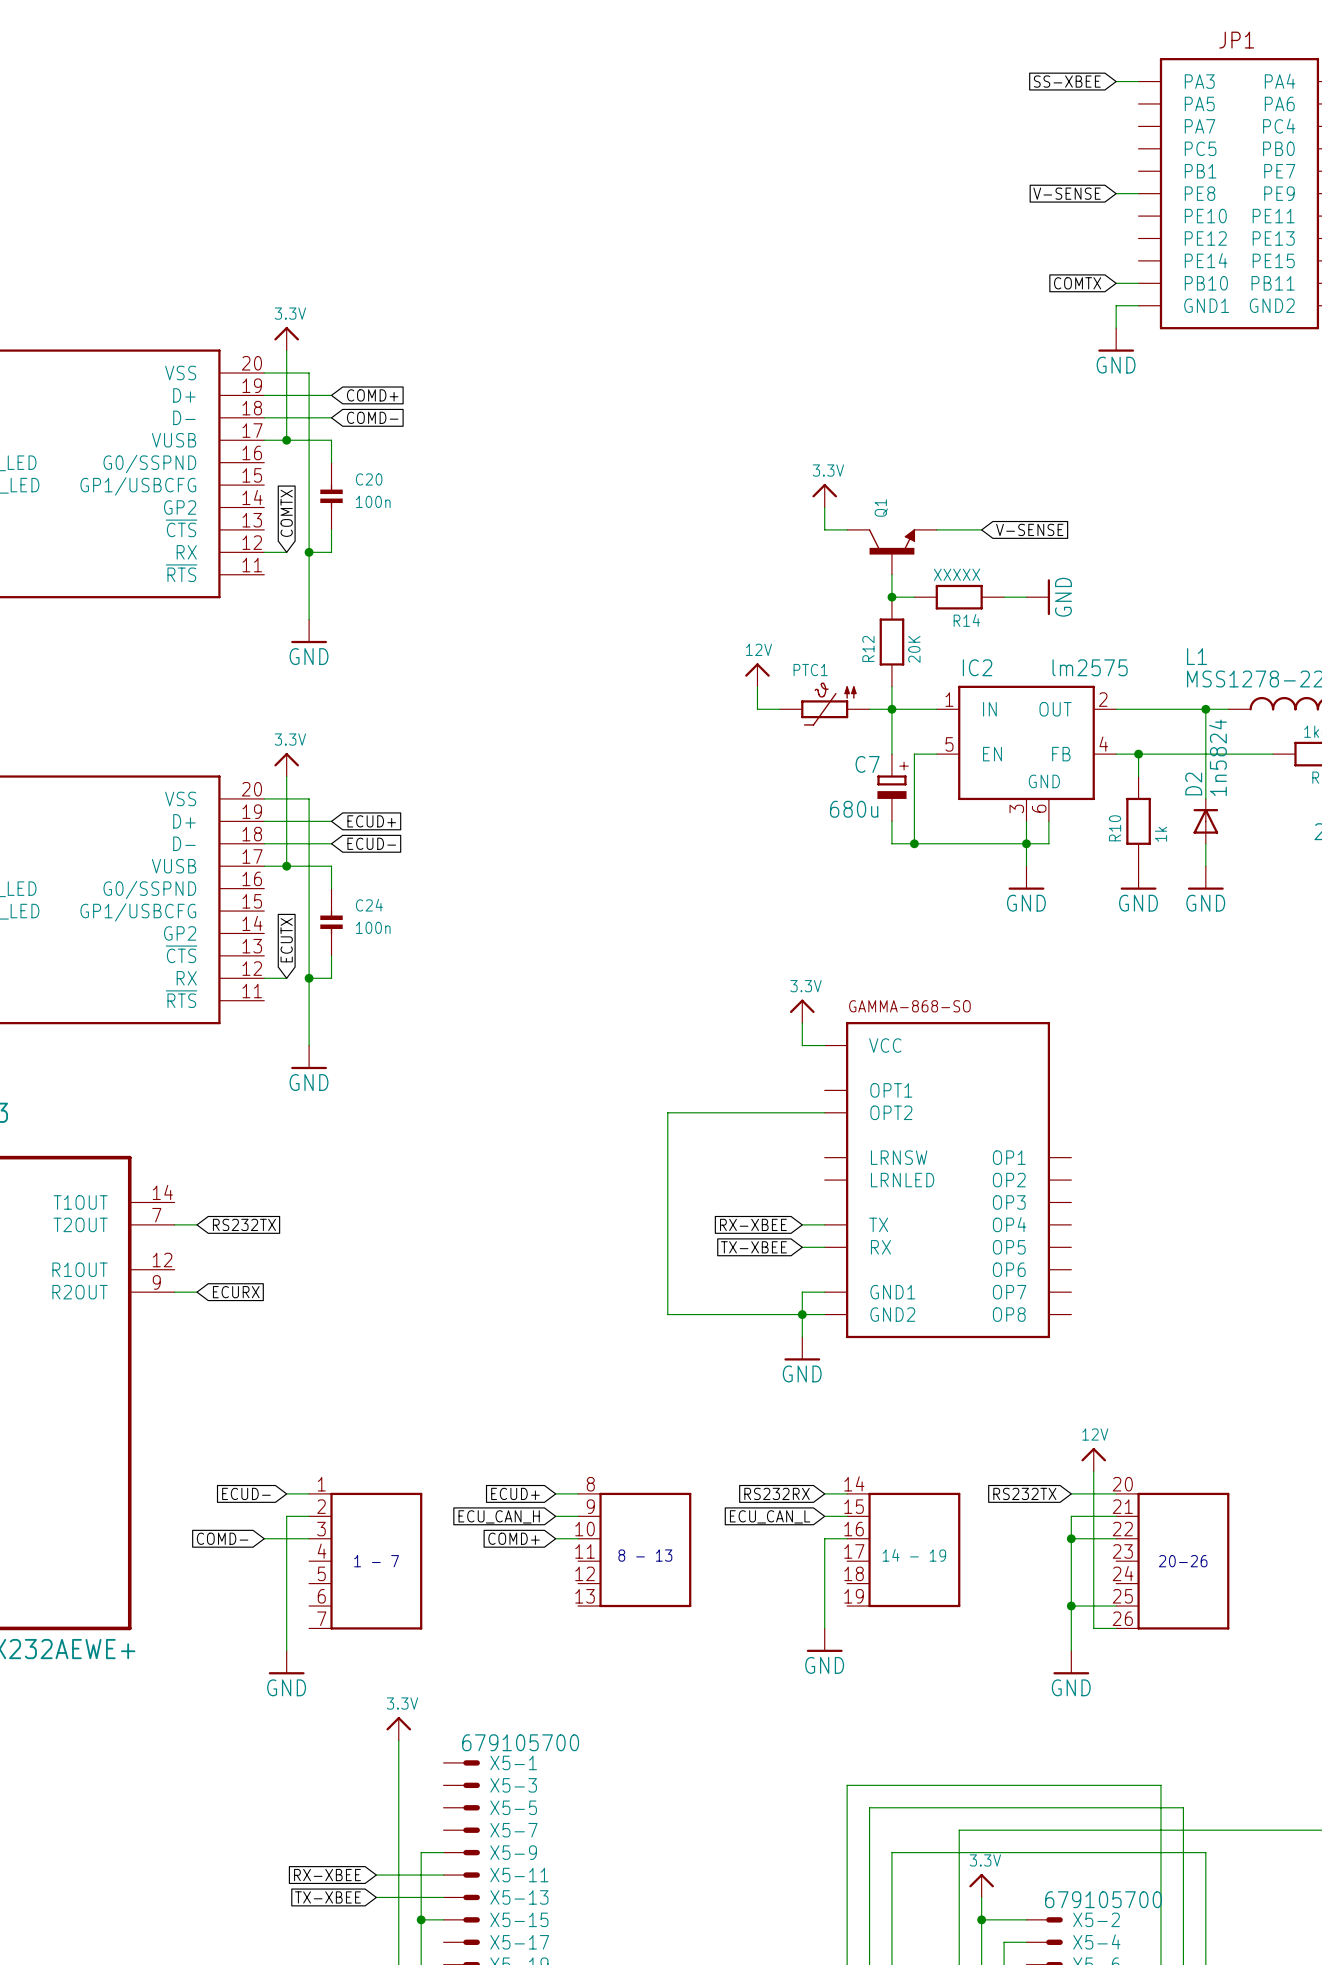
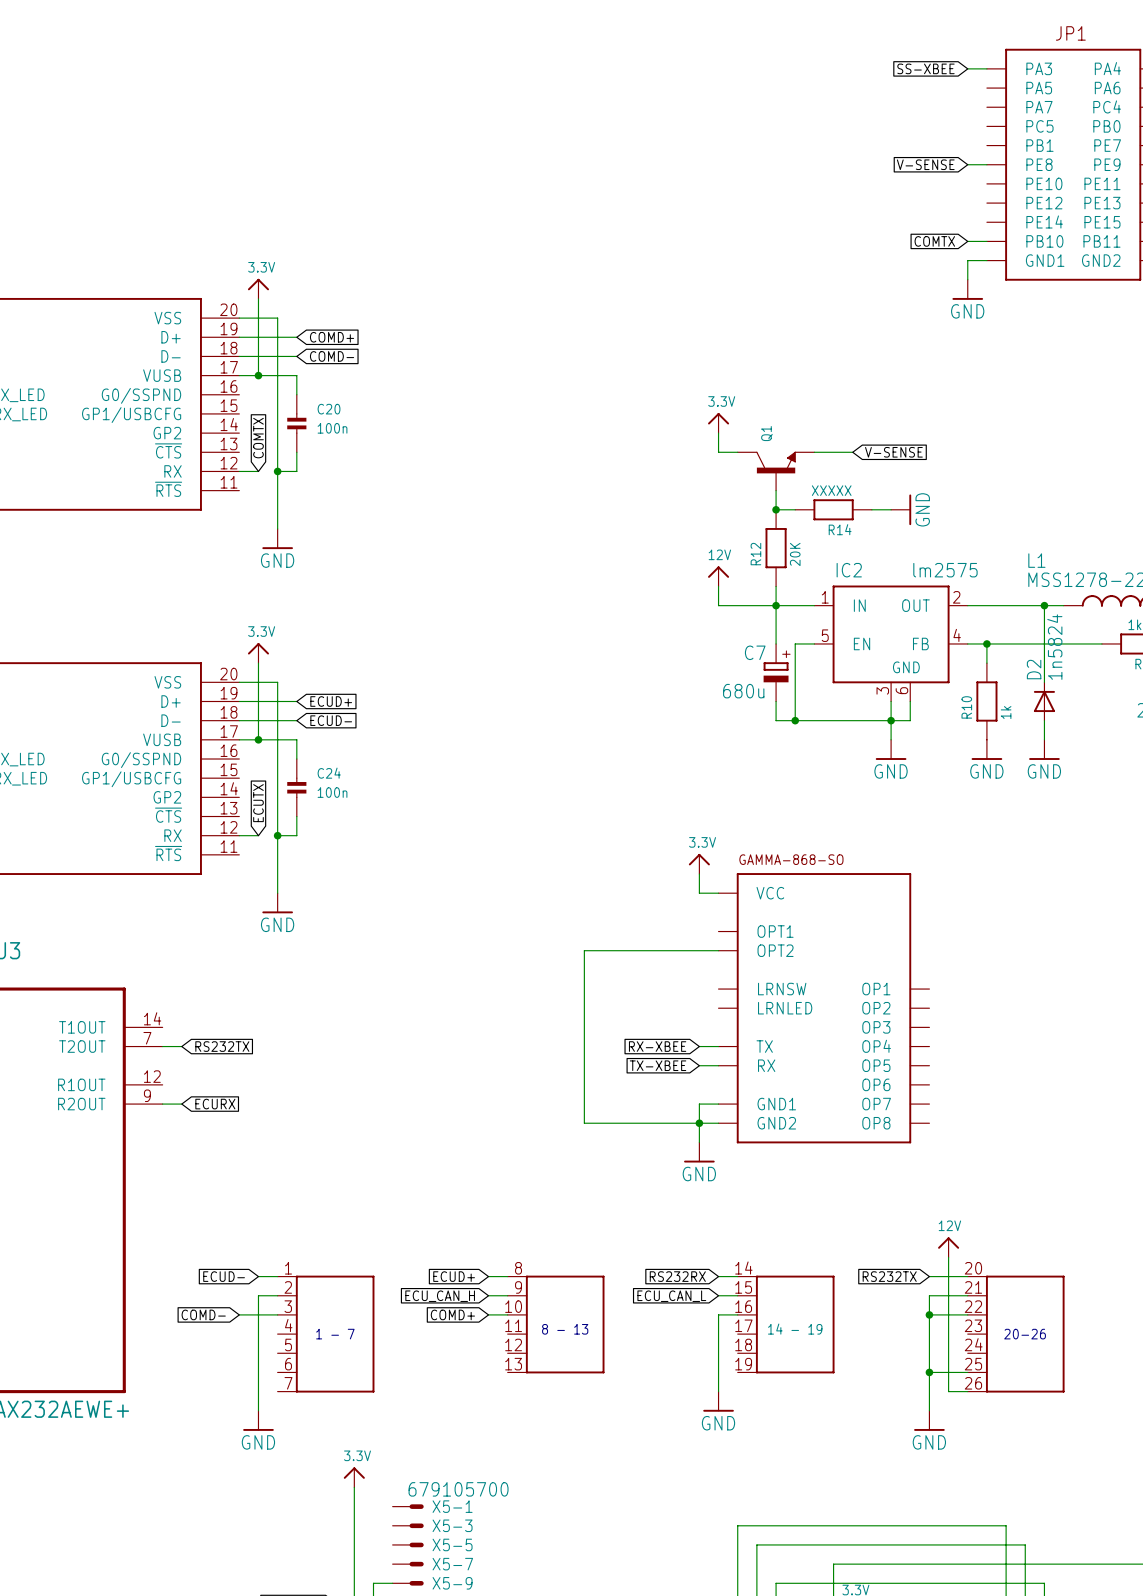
power symbol position: 12V (757, 675) -> 12V (718, 576)
wire: (757, 686) (757, 709) (779, 709) -> none
wire: none -> (718, 586) (718, 605) (756, 605)
PTC1: (824, 704) -> none

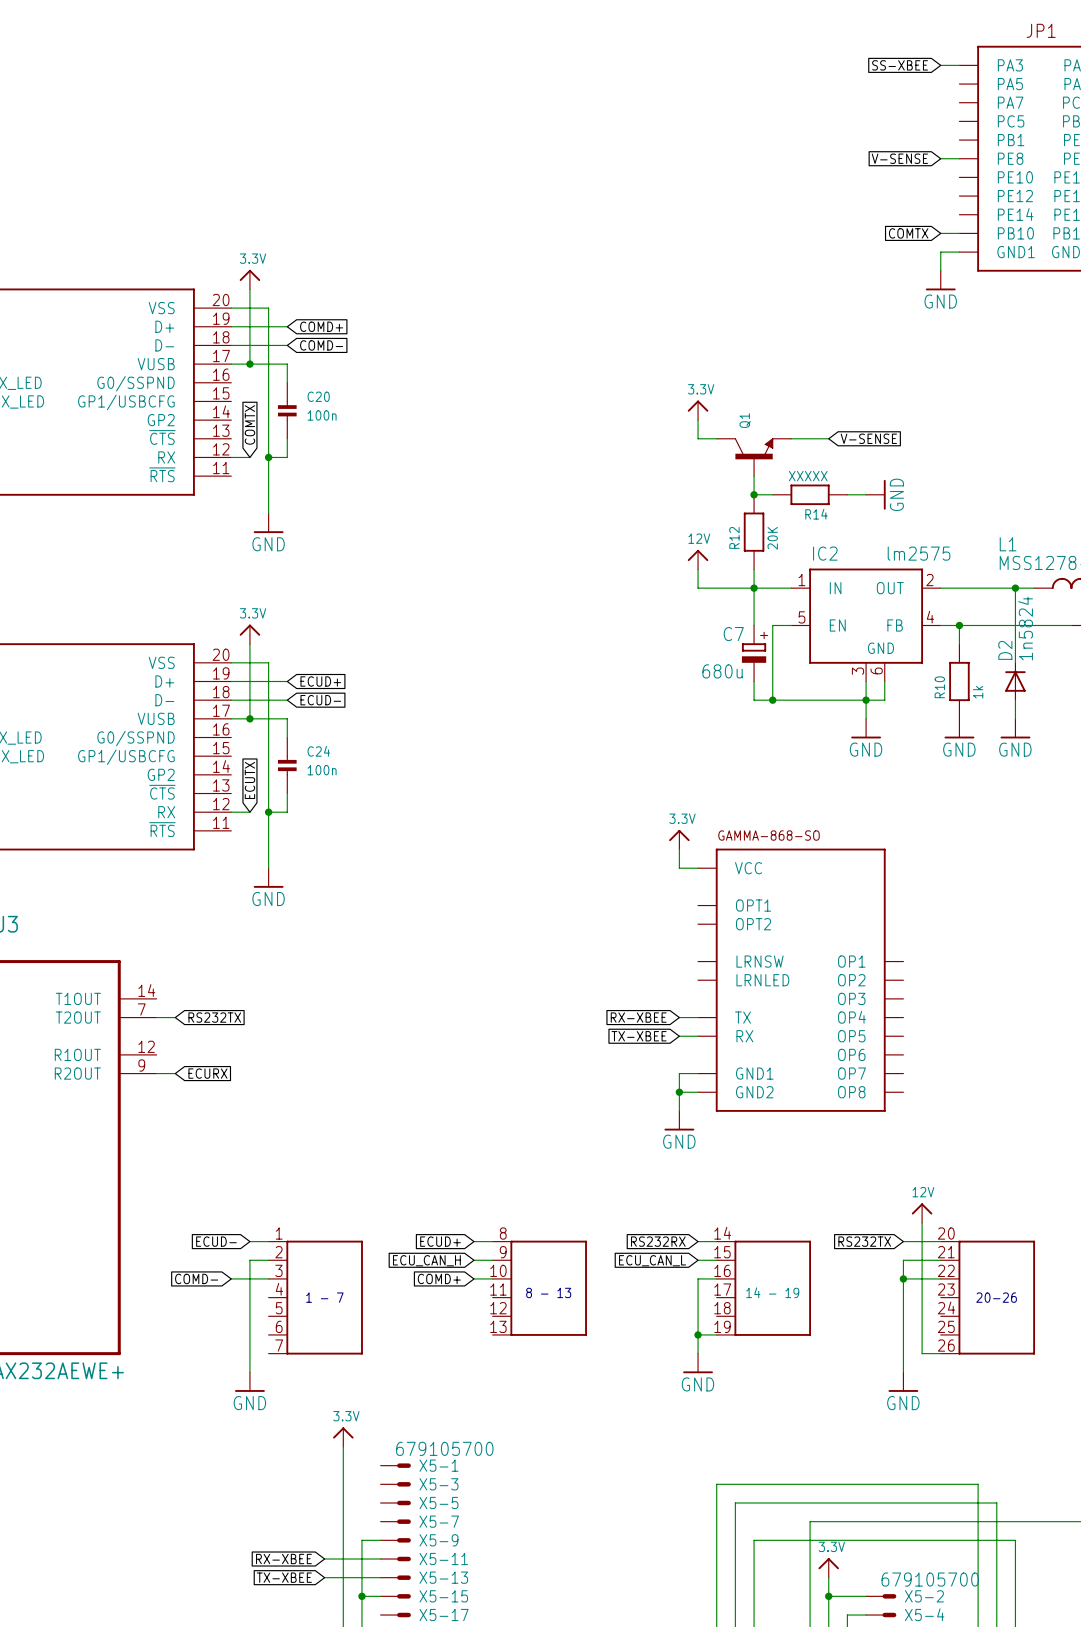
wire: (718, 950) (584, 950) (584, 1123) (699, 1123) -> none
wire: none -> (698, 1334) (716, 1334)
junction: none -> (698, 1334)
wire: (929, 1372) (967, 1372) -> none
junction: (929, 1372) -> none

